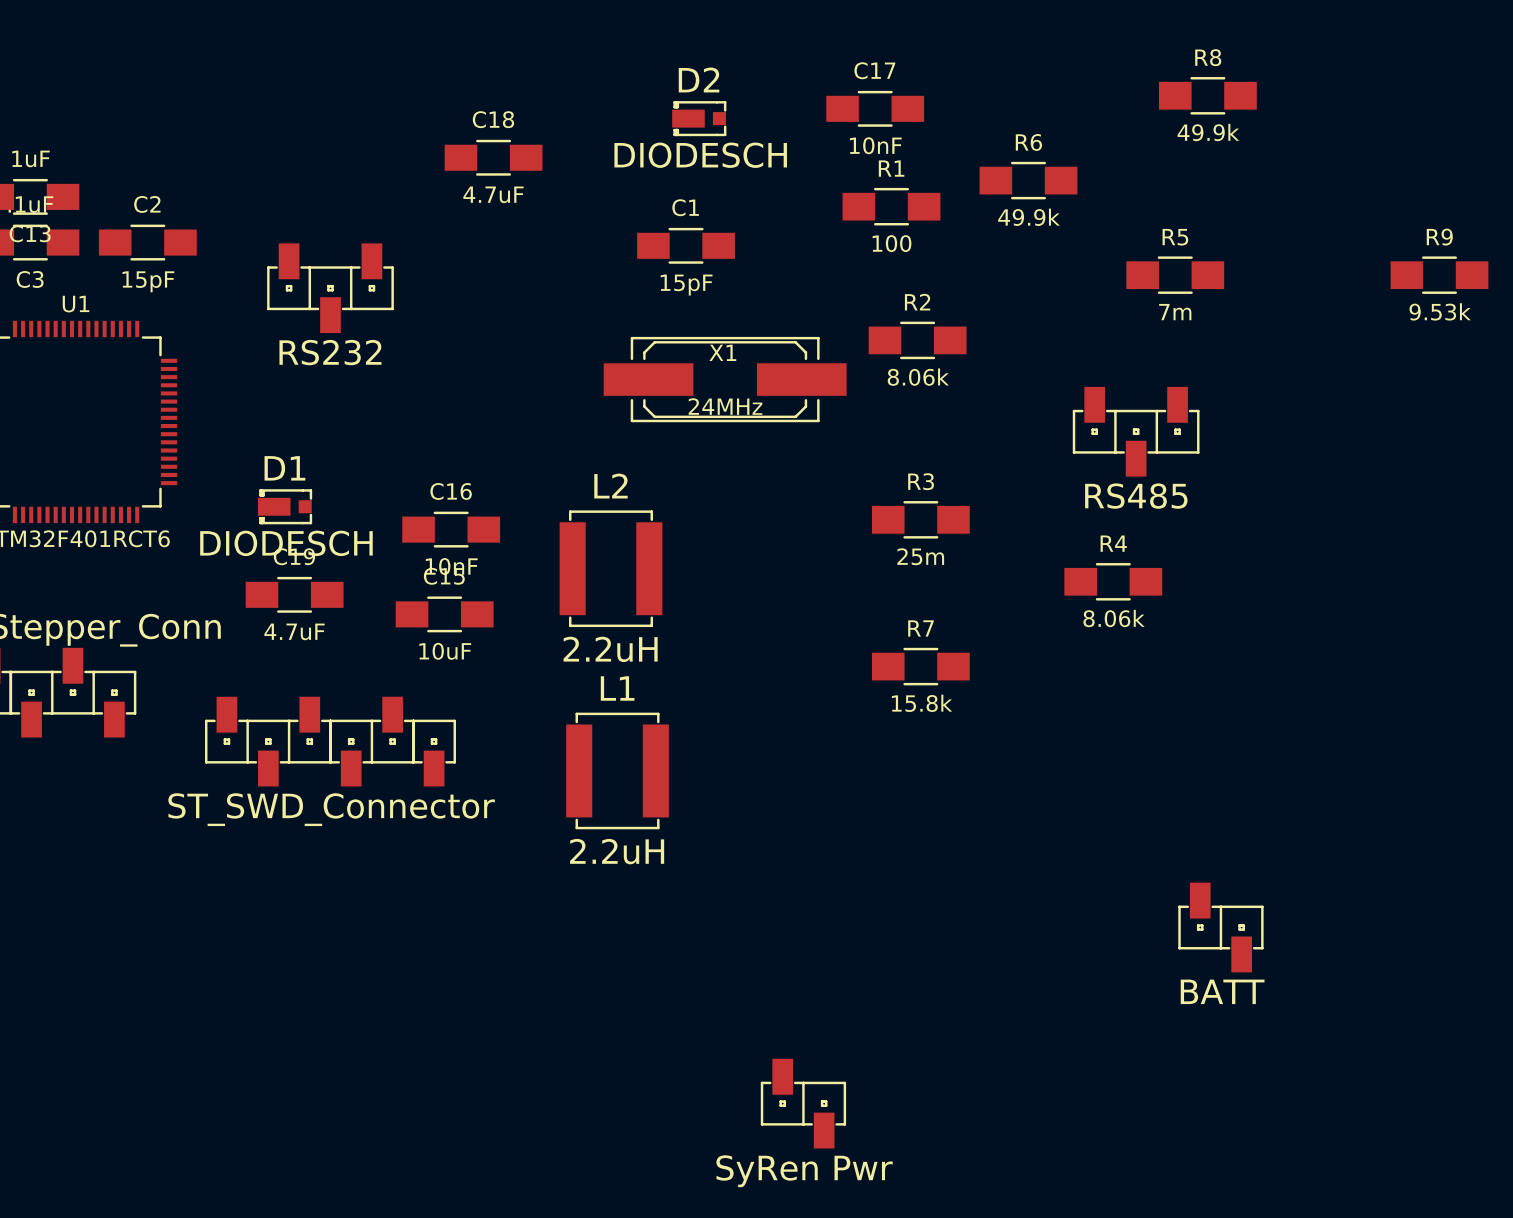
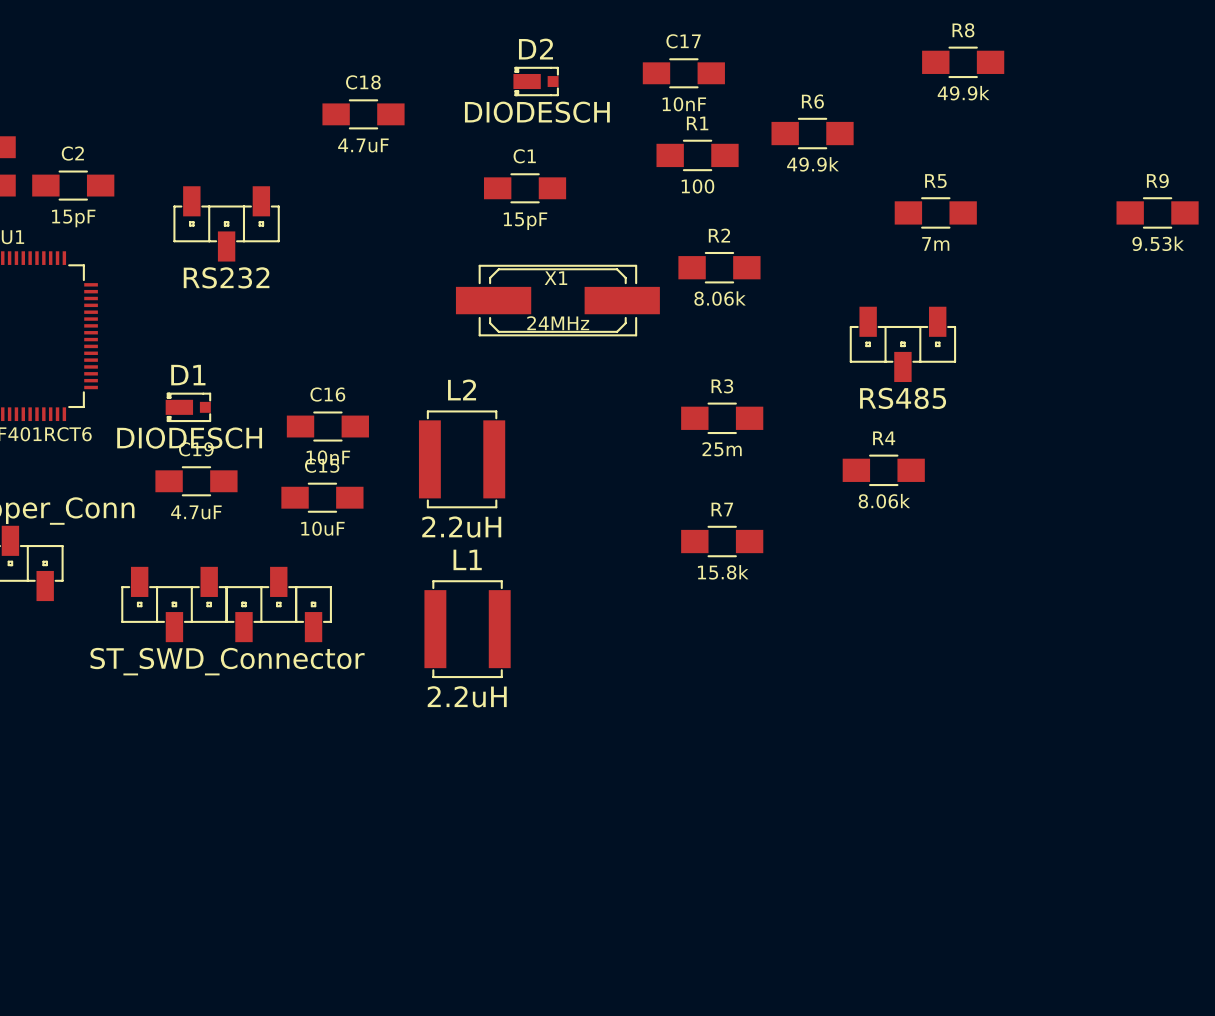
part: BATT (1220, 927) -> none
part: SyRen Pwr (803, 1103) -> none

